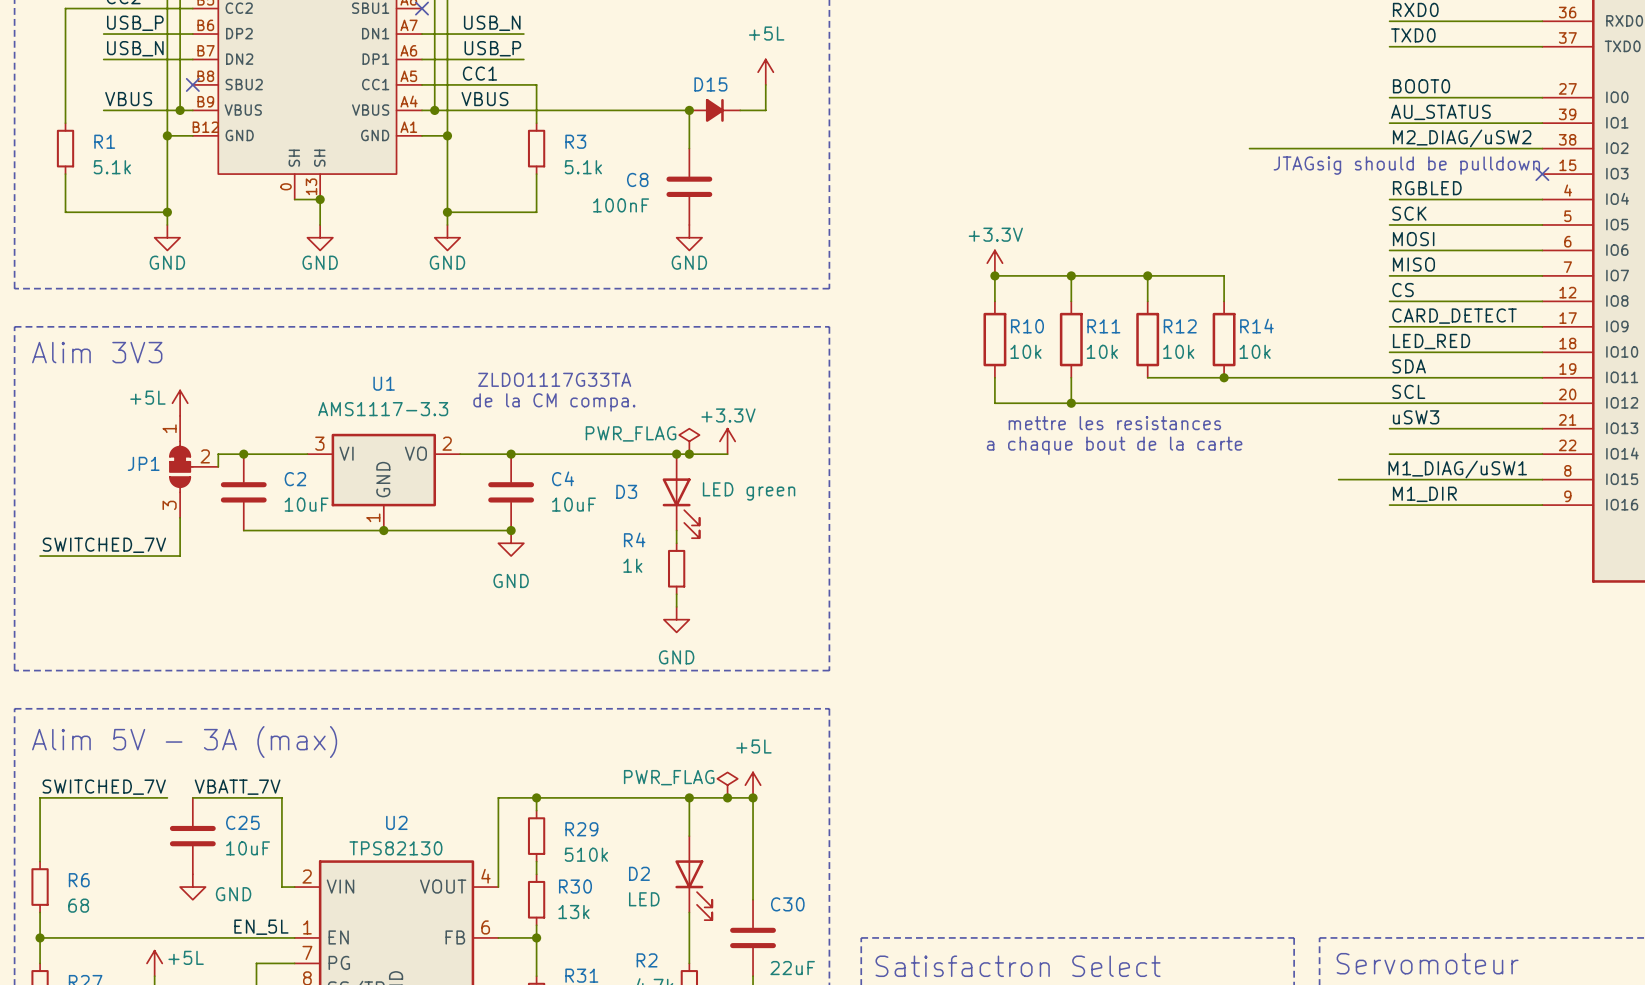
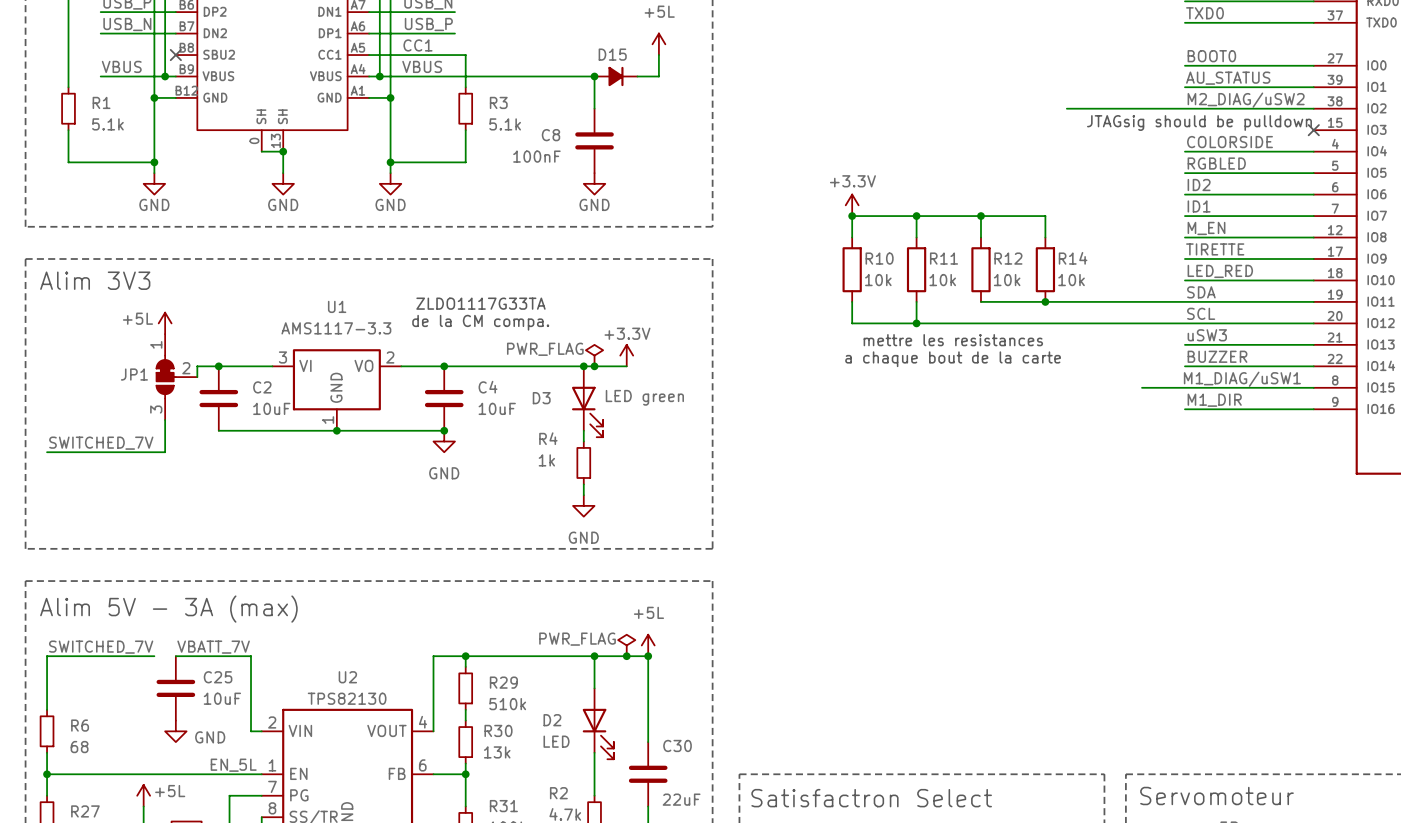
label: RGBLED (1427, 188) -> COLORSIDE (1230, 142)
label: SCK (1409, 213) -> RGBLED (1216, 163)
label: MOSI (1413, 239) -> ID2 (1199, 185)
label: MISO (1413, 264) -> ID1 (1199, 206)
label: CS (1403, 290) -> M_EN (1206, 228)
label: CARD_DETECT (1454, 316) -> TIRETTE (1215, 249)
label: none -> BUZZER (1217, 356)

